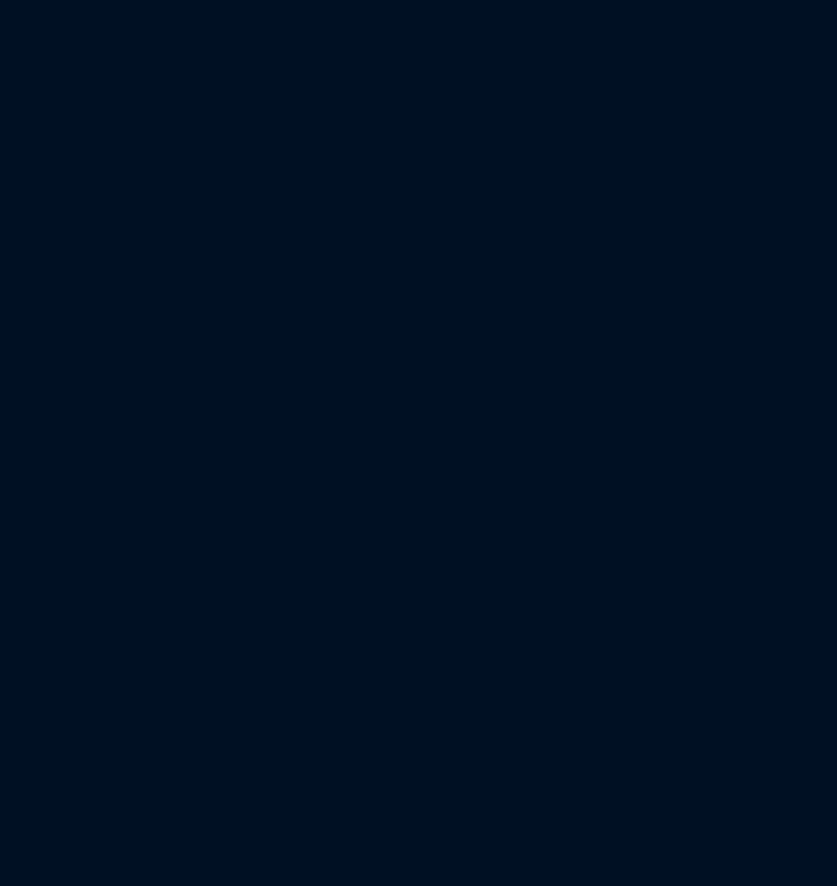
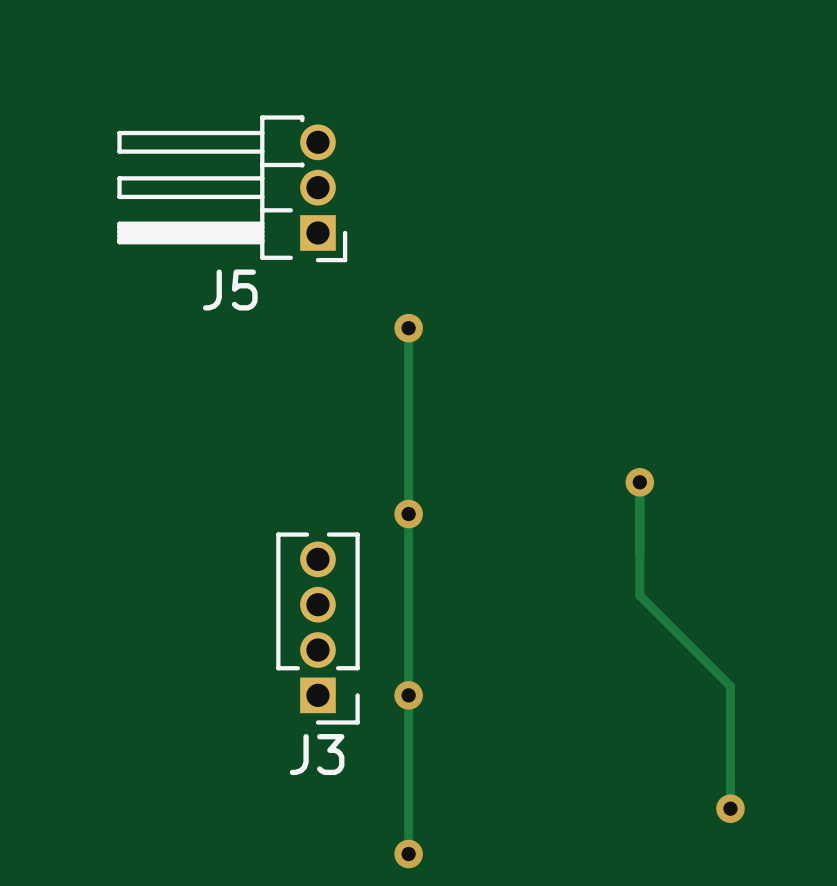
J5: none -> (232, 188)
track: none -> (408, 328) (408, 854)
via: none -> (408, 328)
track: none -> (639, 482) (639, 595) (730, 686) (730, 808)
via: none -> (639, 482)
via: none -> (408, 514)
J3: none -> (317, 628)
via: none -> (408, 695)
via: none -> (730, 808)
via: none -> (408, 854)

